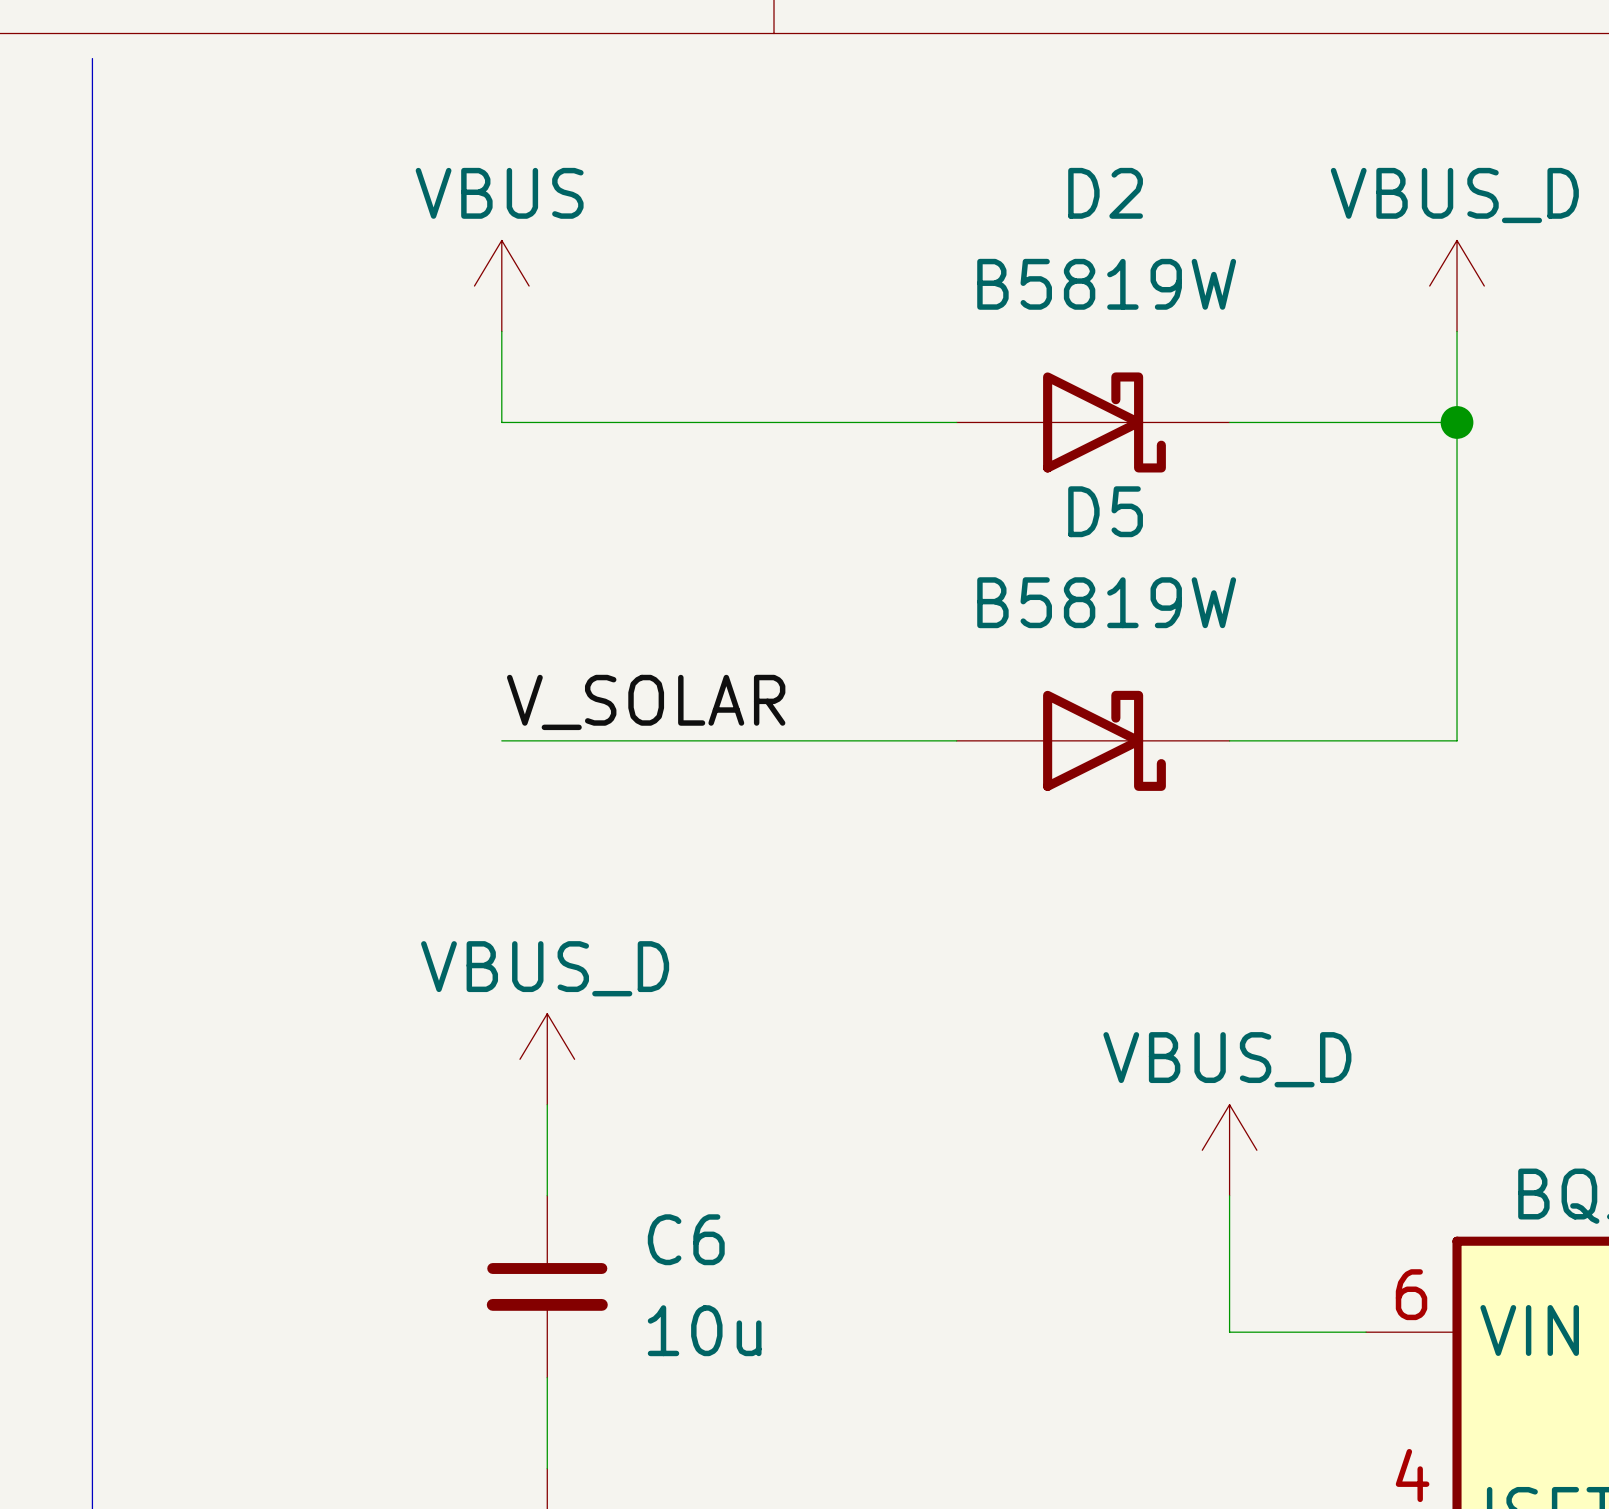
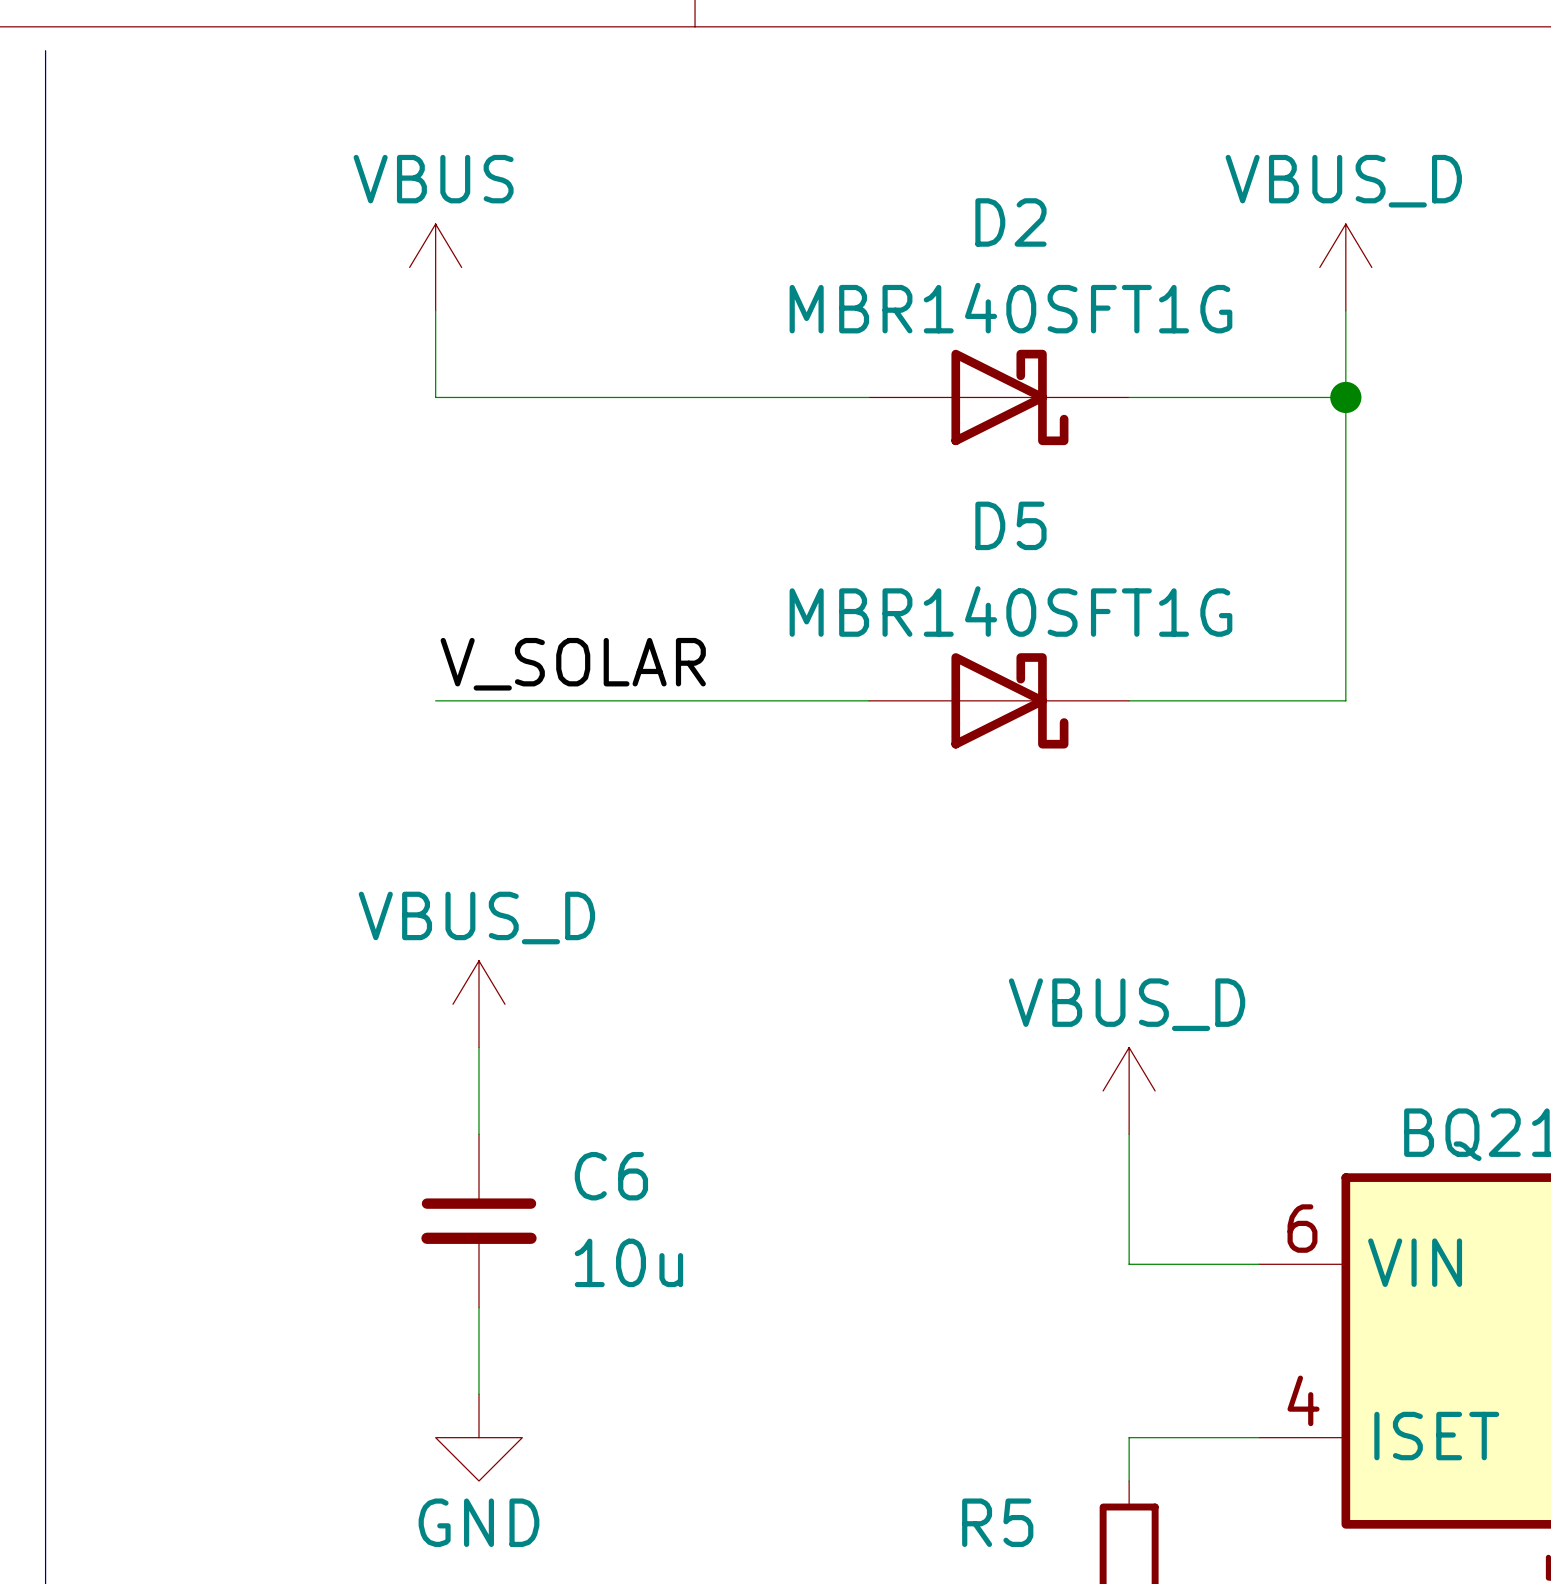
D2 name position: D2 (1105, 193) -> D2 (1010, 222)
D2 value: B5819W (1106, 284) -> MBR140SFT1G (1010, 308)
D5 name position: D5 (1105, 511) -> D5 (1010, 525)
D5 value: B5819W (1106, 602) -> MBR140SFT1G (1010, 611)

